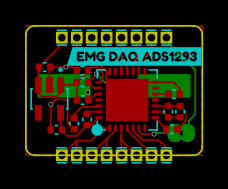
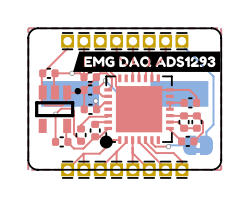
part footprint: [30, 67, 69, 121] -> [35, 85, 81, 133]

